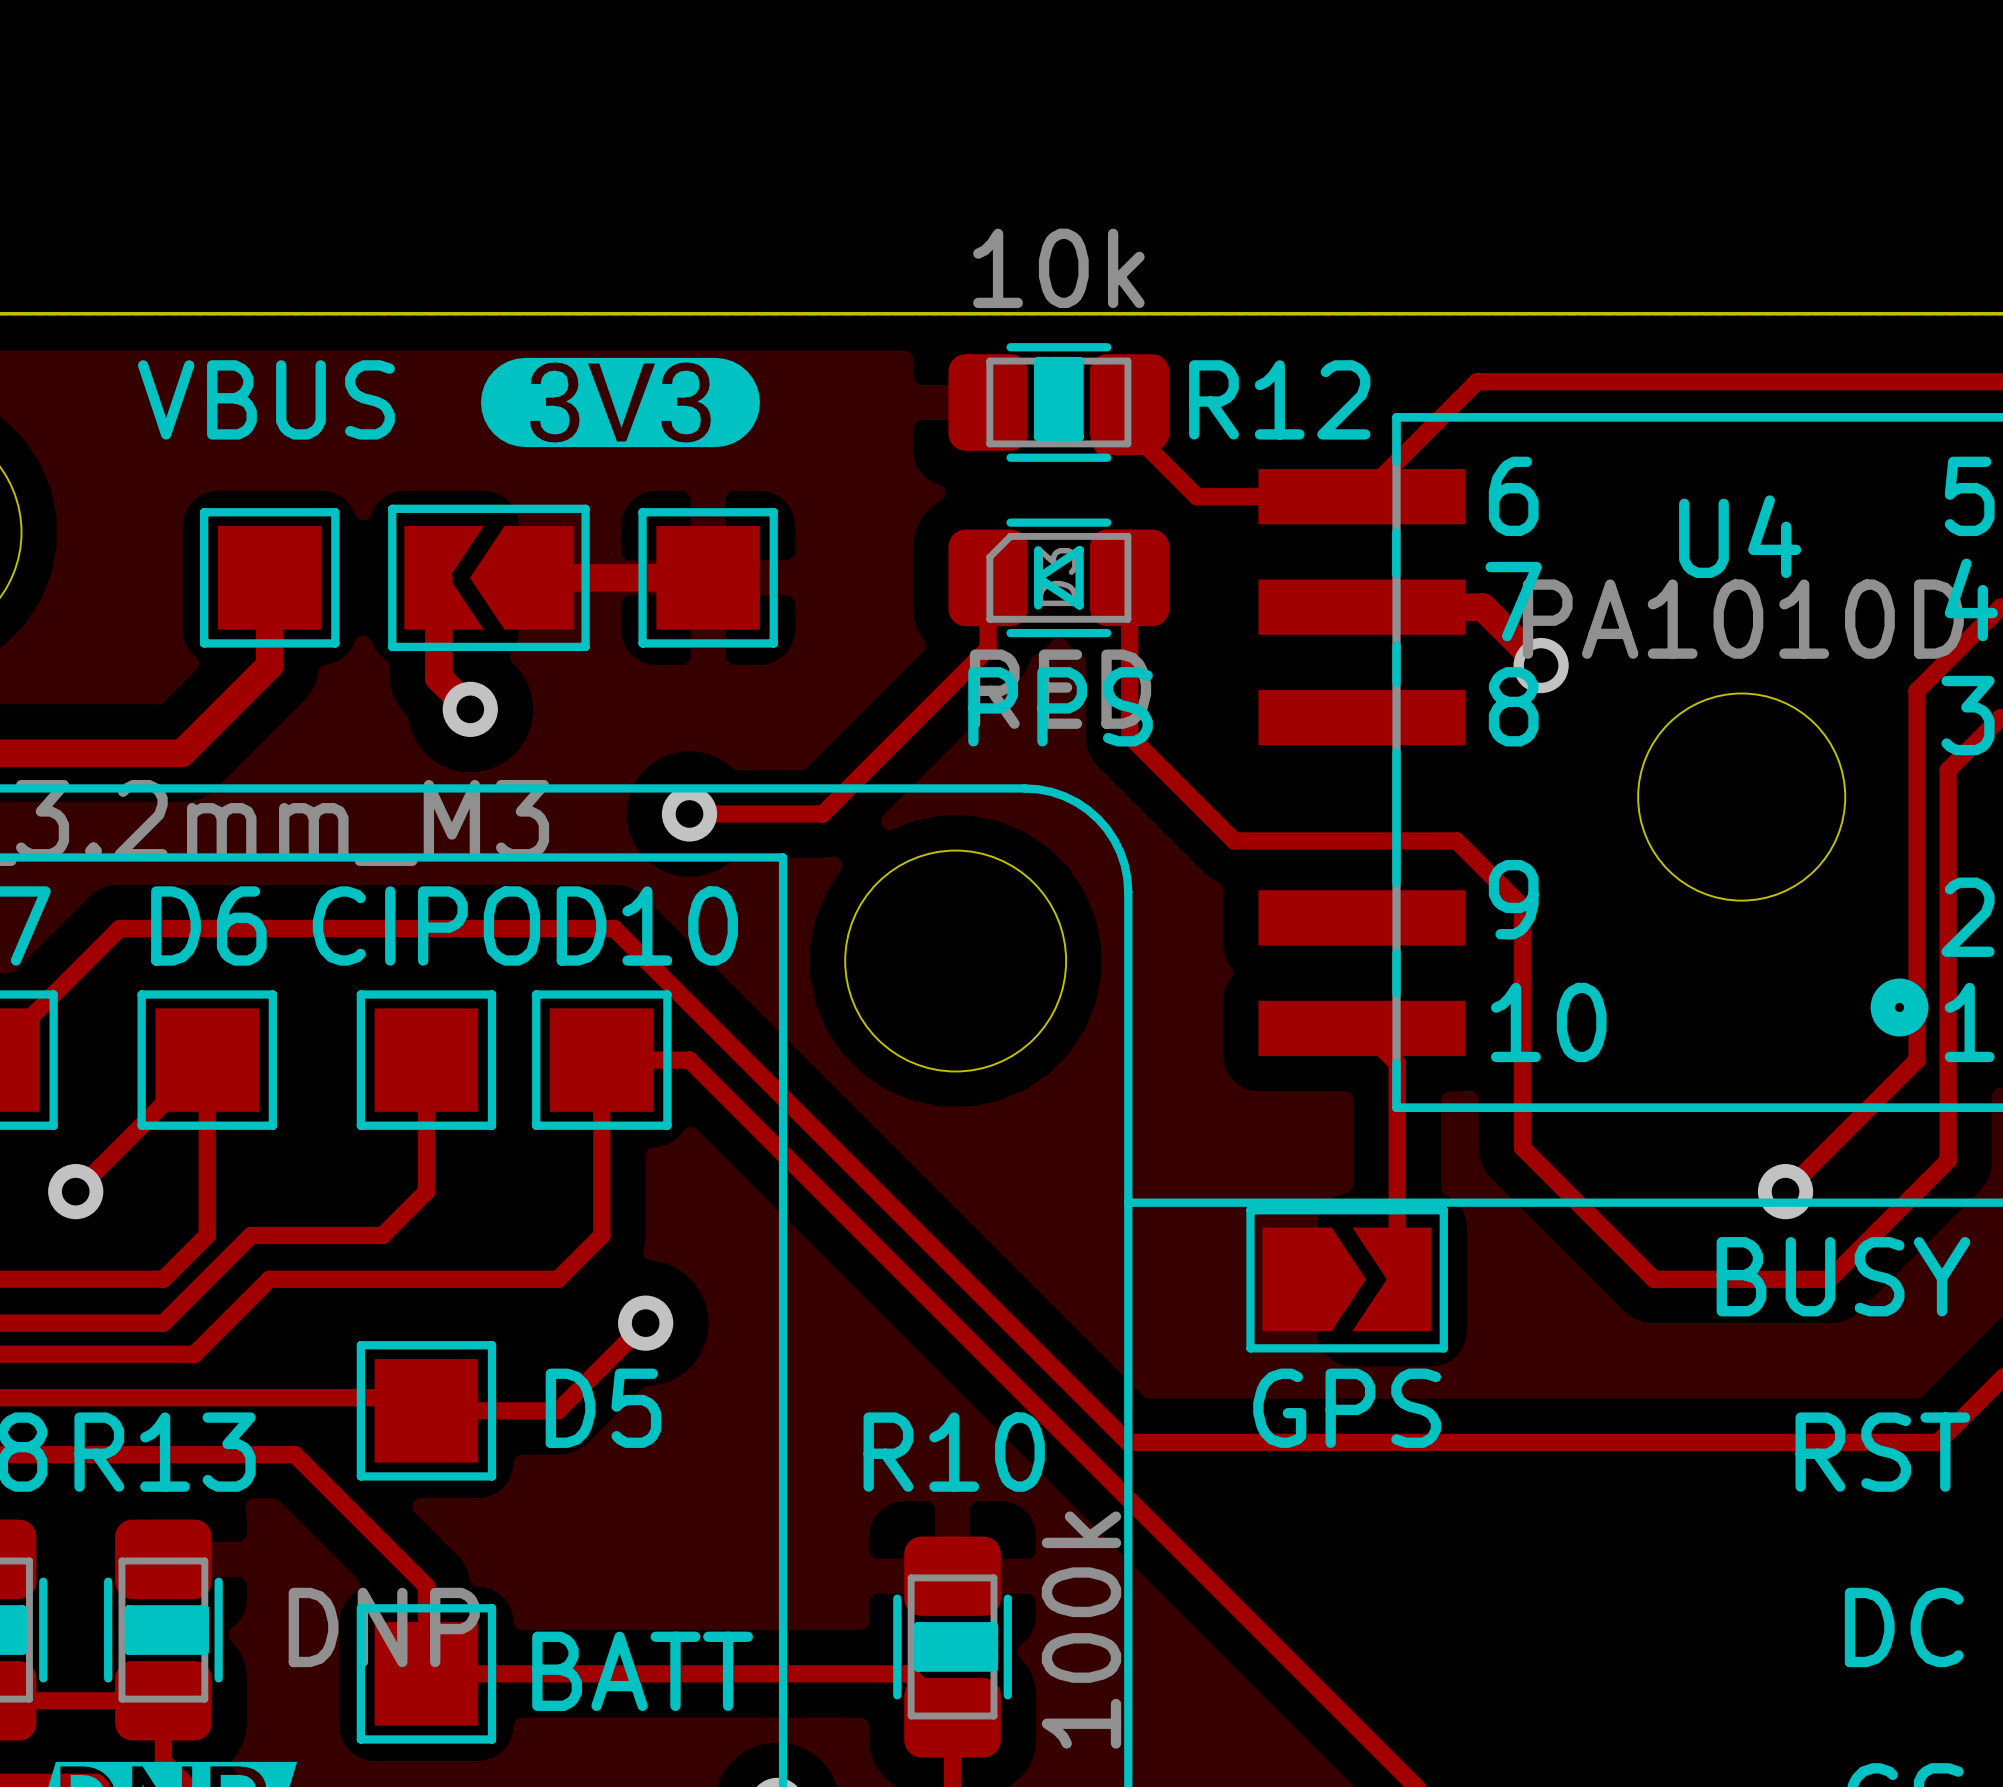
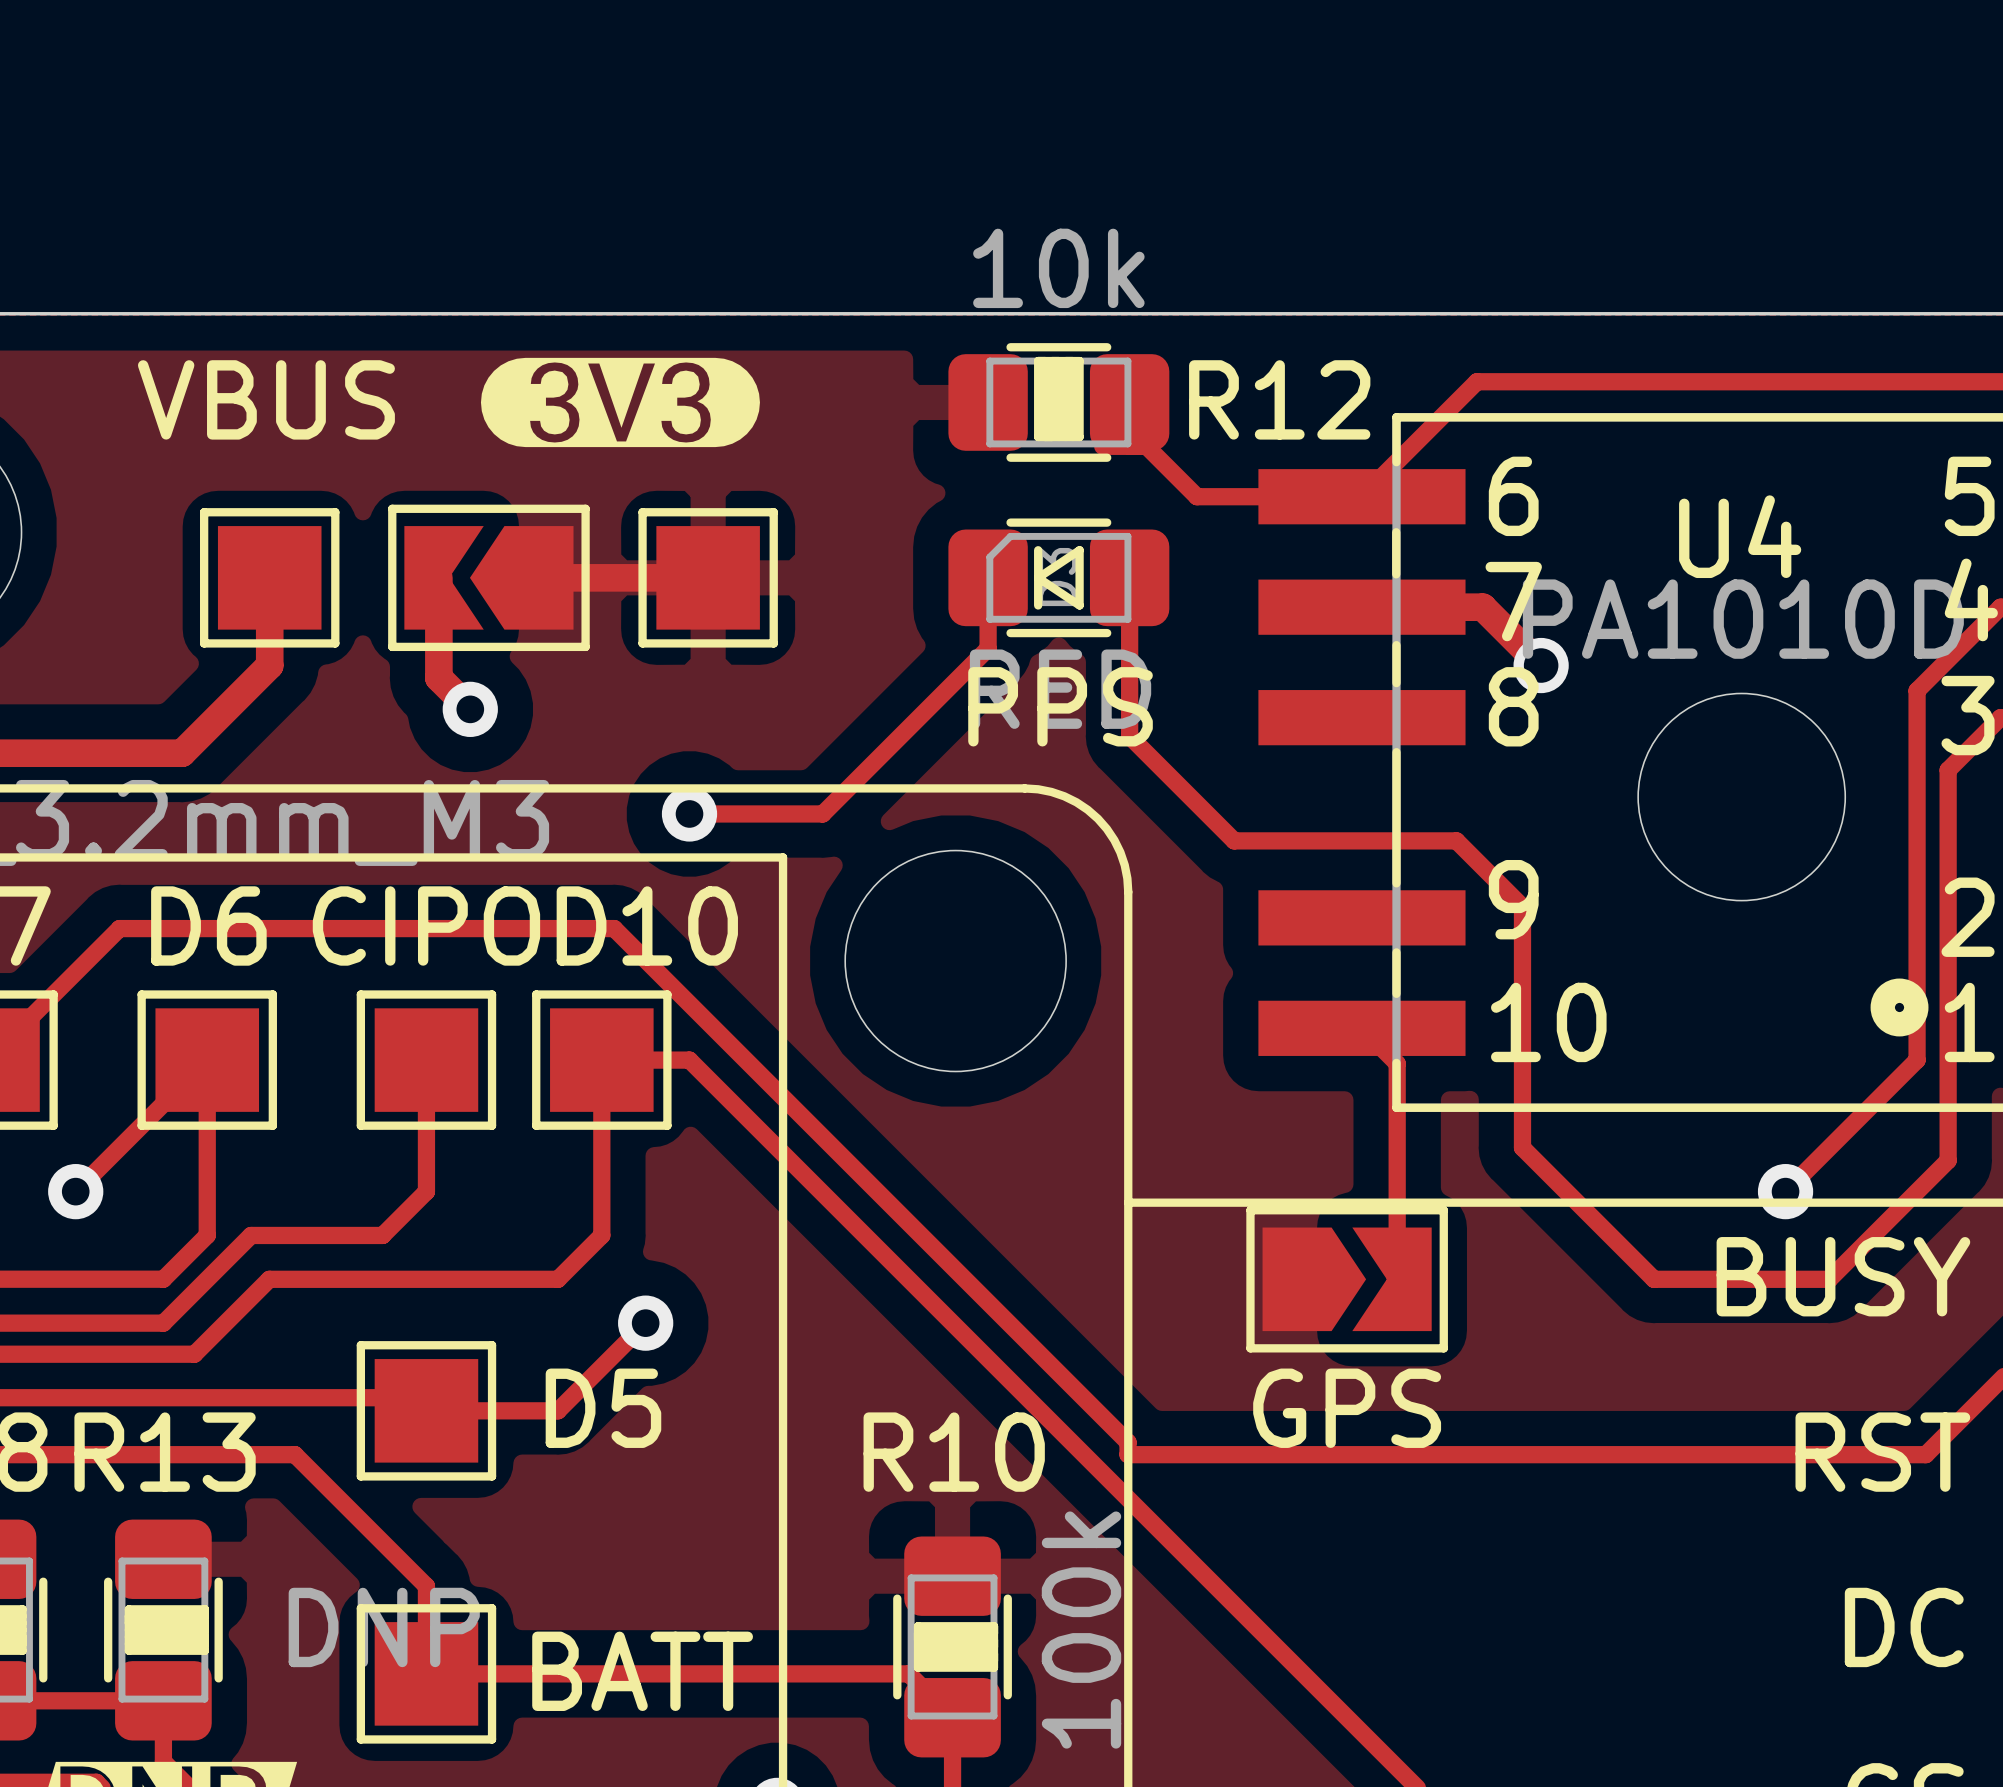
track: (1128, 1442) (1938, 1442) -> (1128, 1442) (1128, 1454) (1925, 1454) (1938, 1442)

